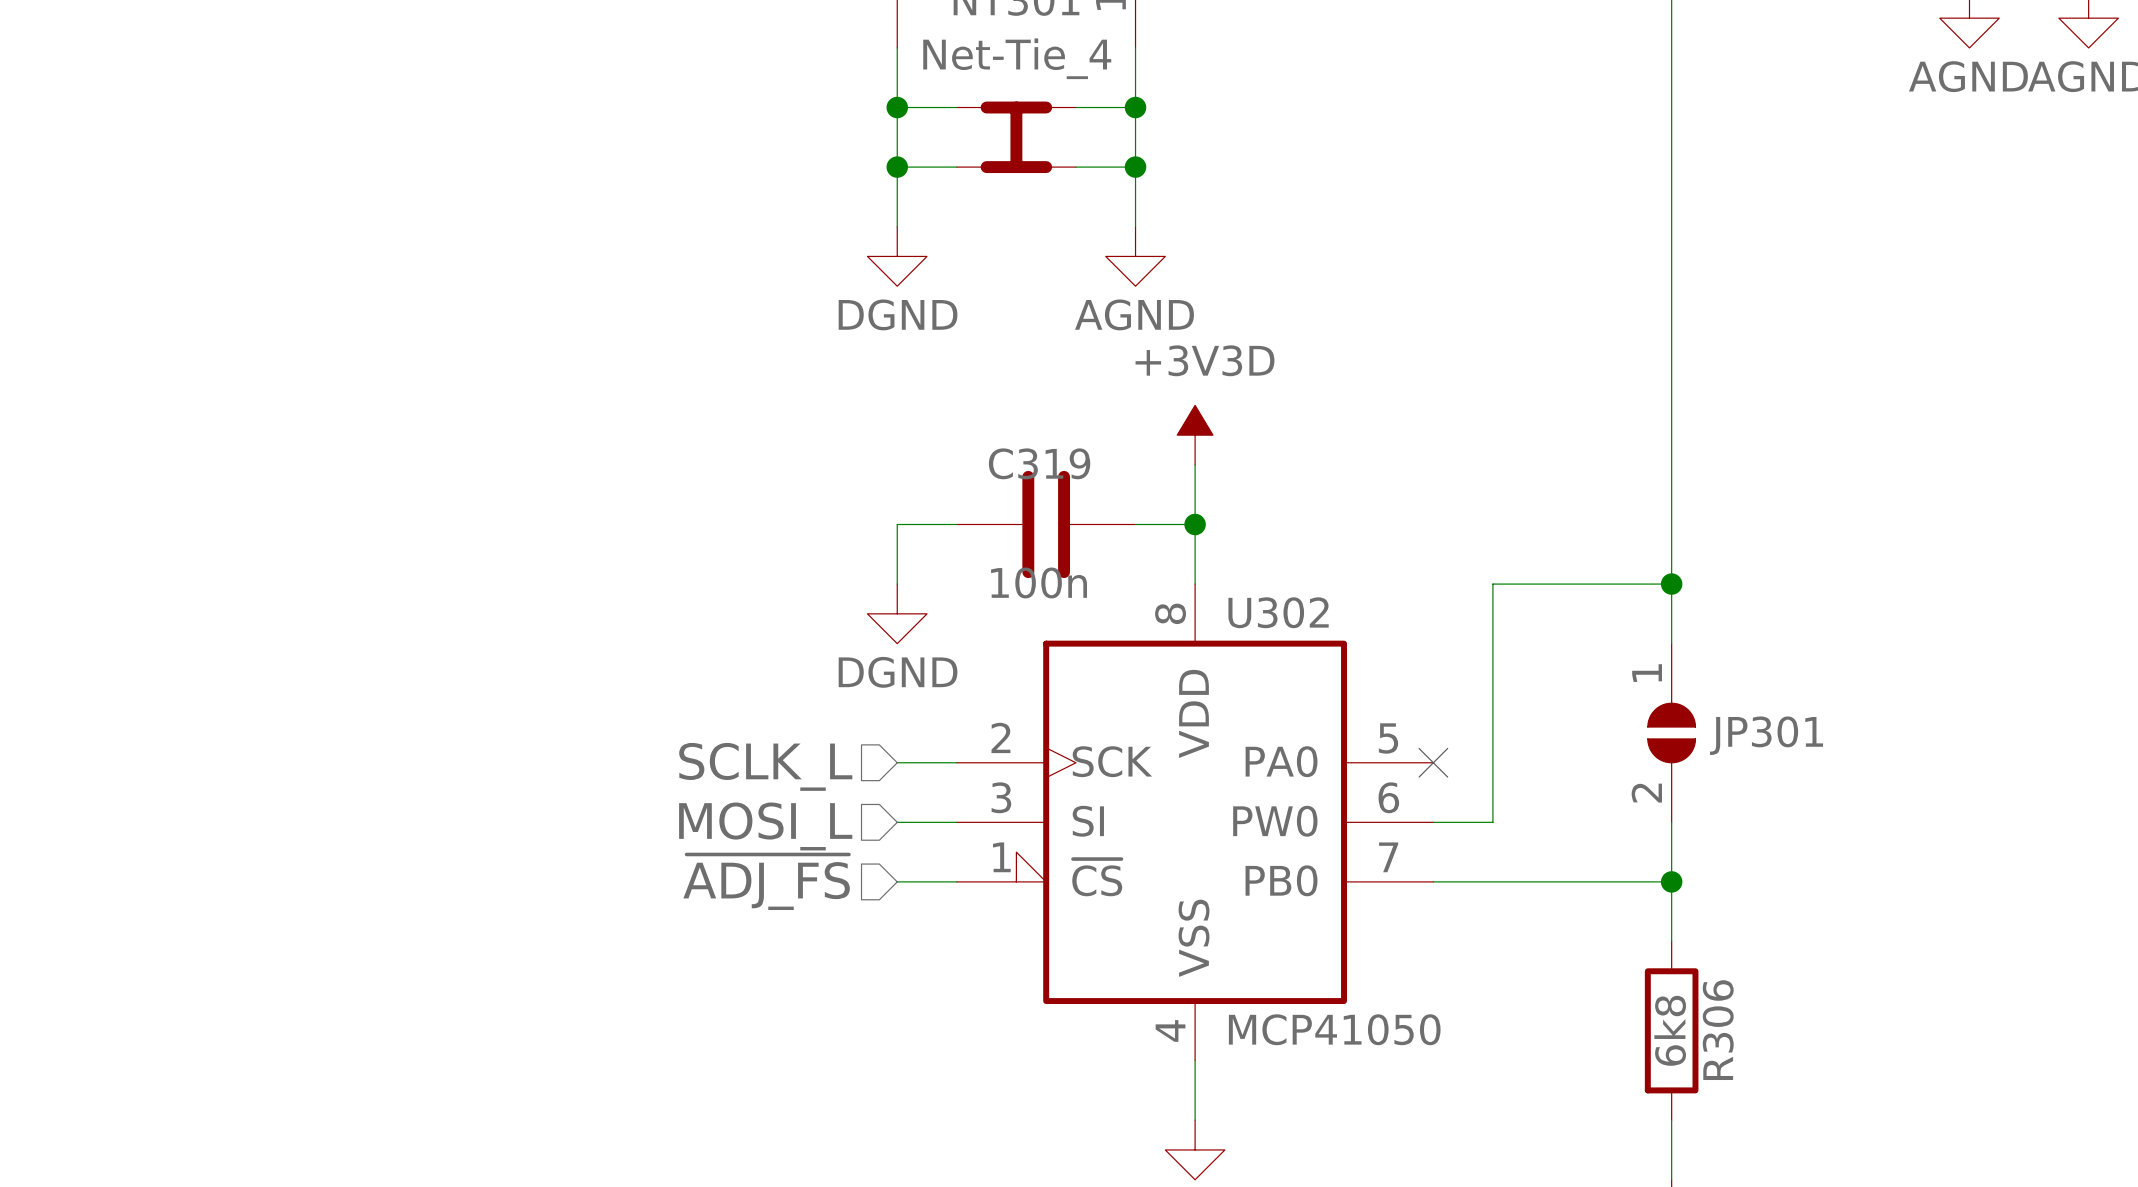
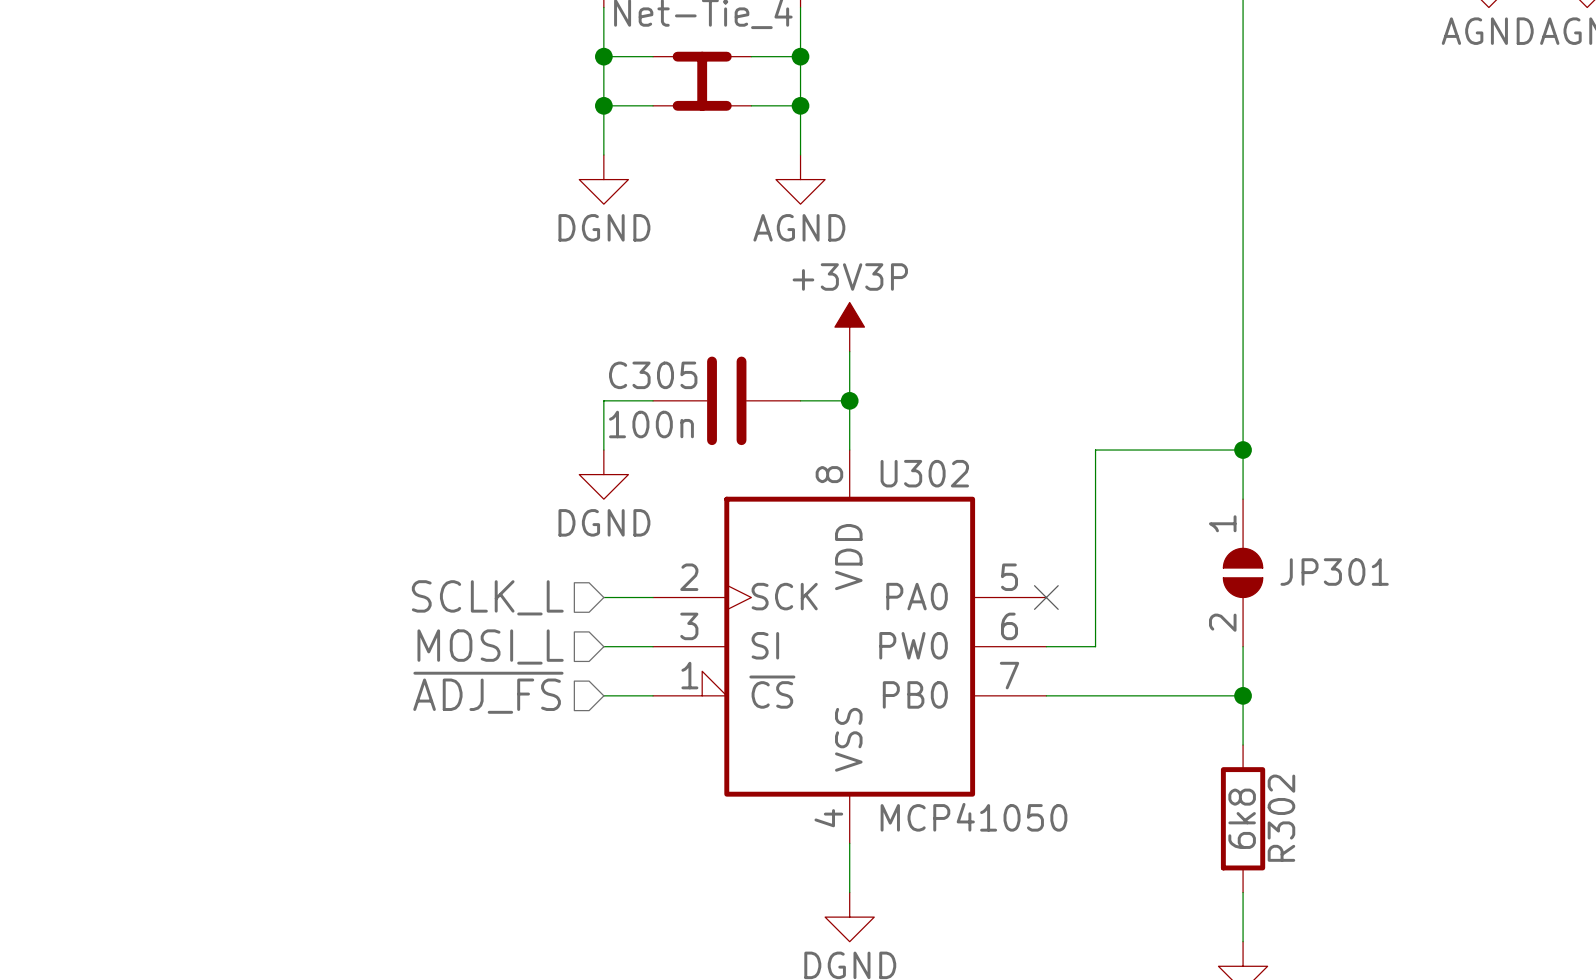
power symbol: +3V3D (1195, 435) -> +3V3P (849, 327)
C319 name: C319 (1039, 463) -> C305 (653, 375)
C319 value position: 100n (1039, 582) -> 100n (651, 424)
R306 name: R306 (1718, 1030) -> R302 (1281, 818)

